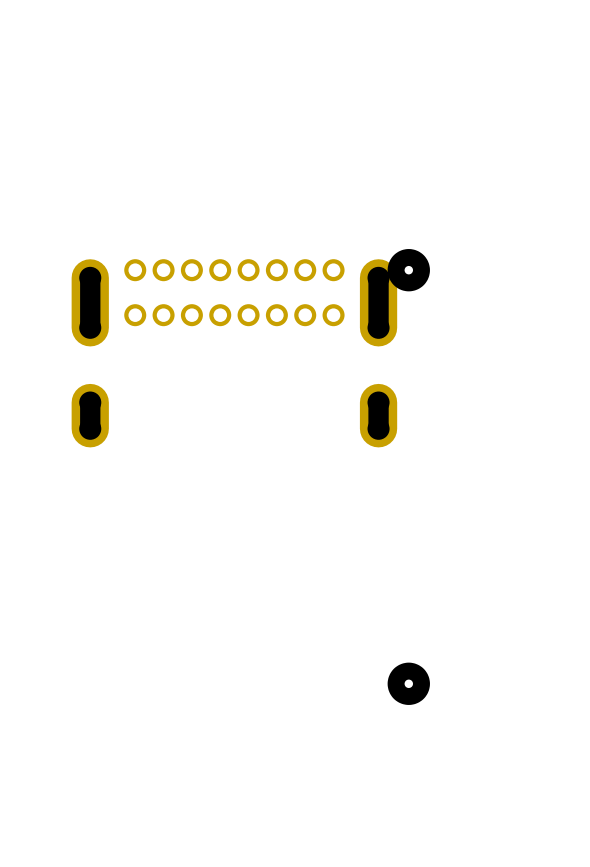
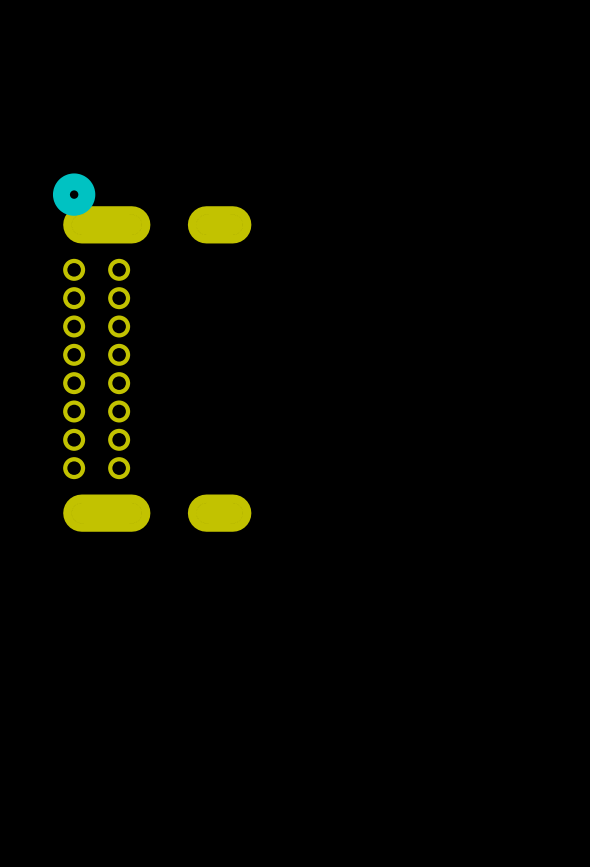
part rotation: 0° (250, 348) -> 90° counterclockwise (152, 352)
part: (408, 683) -> none

